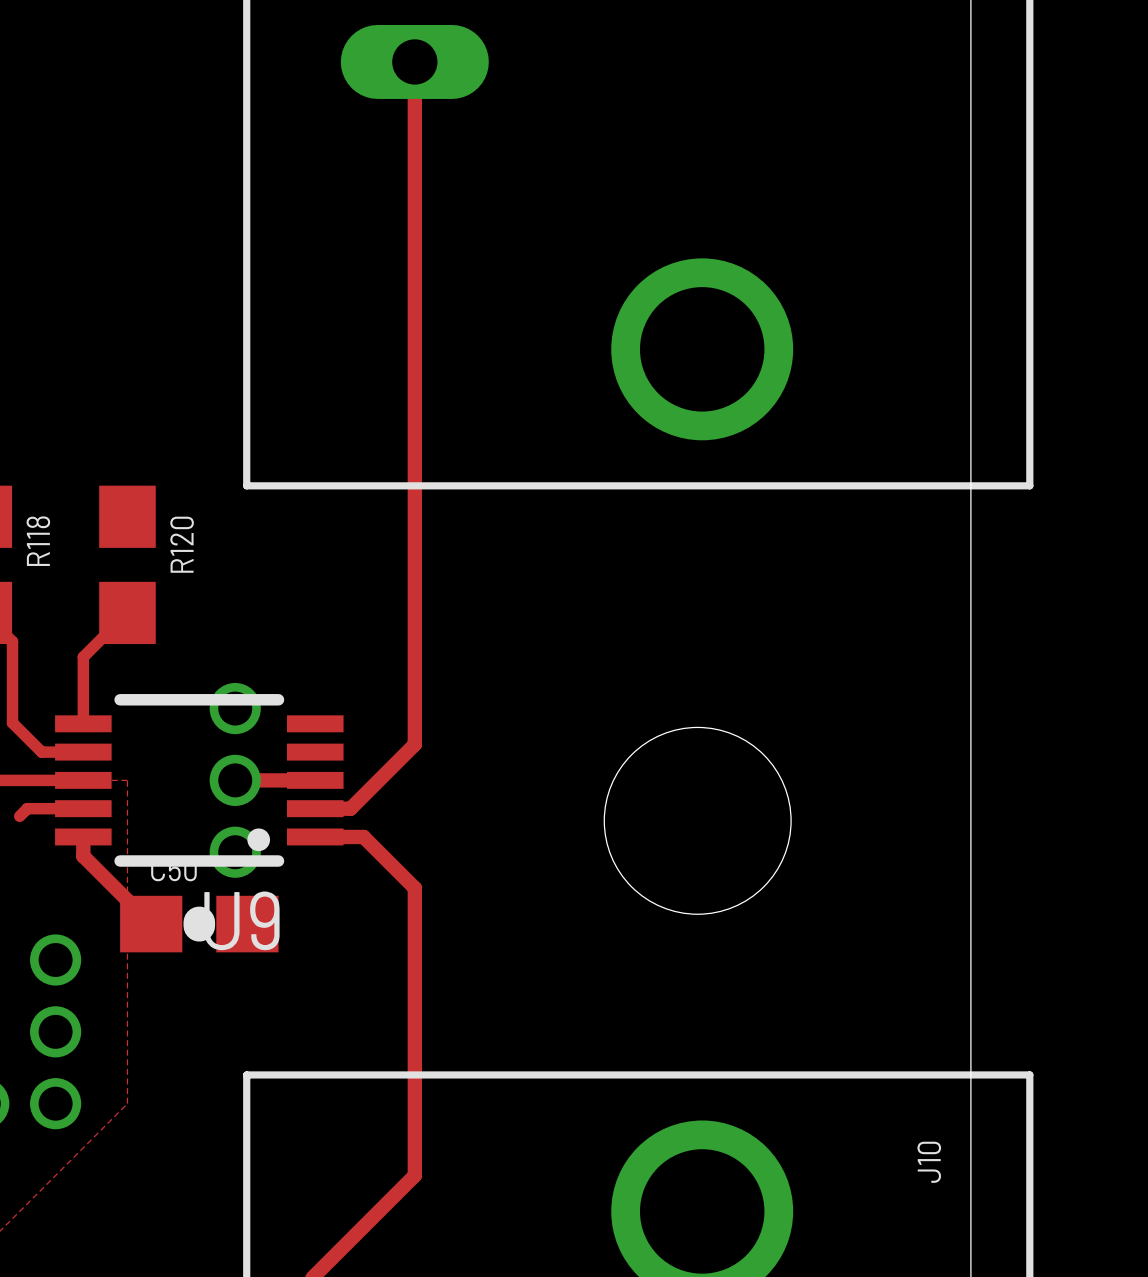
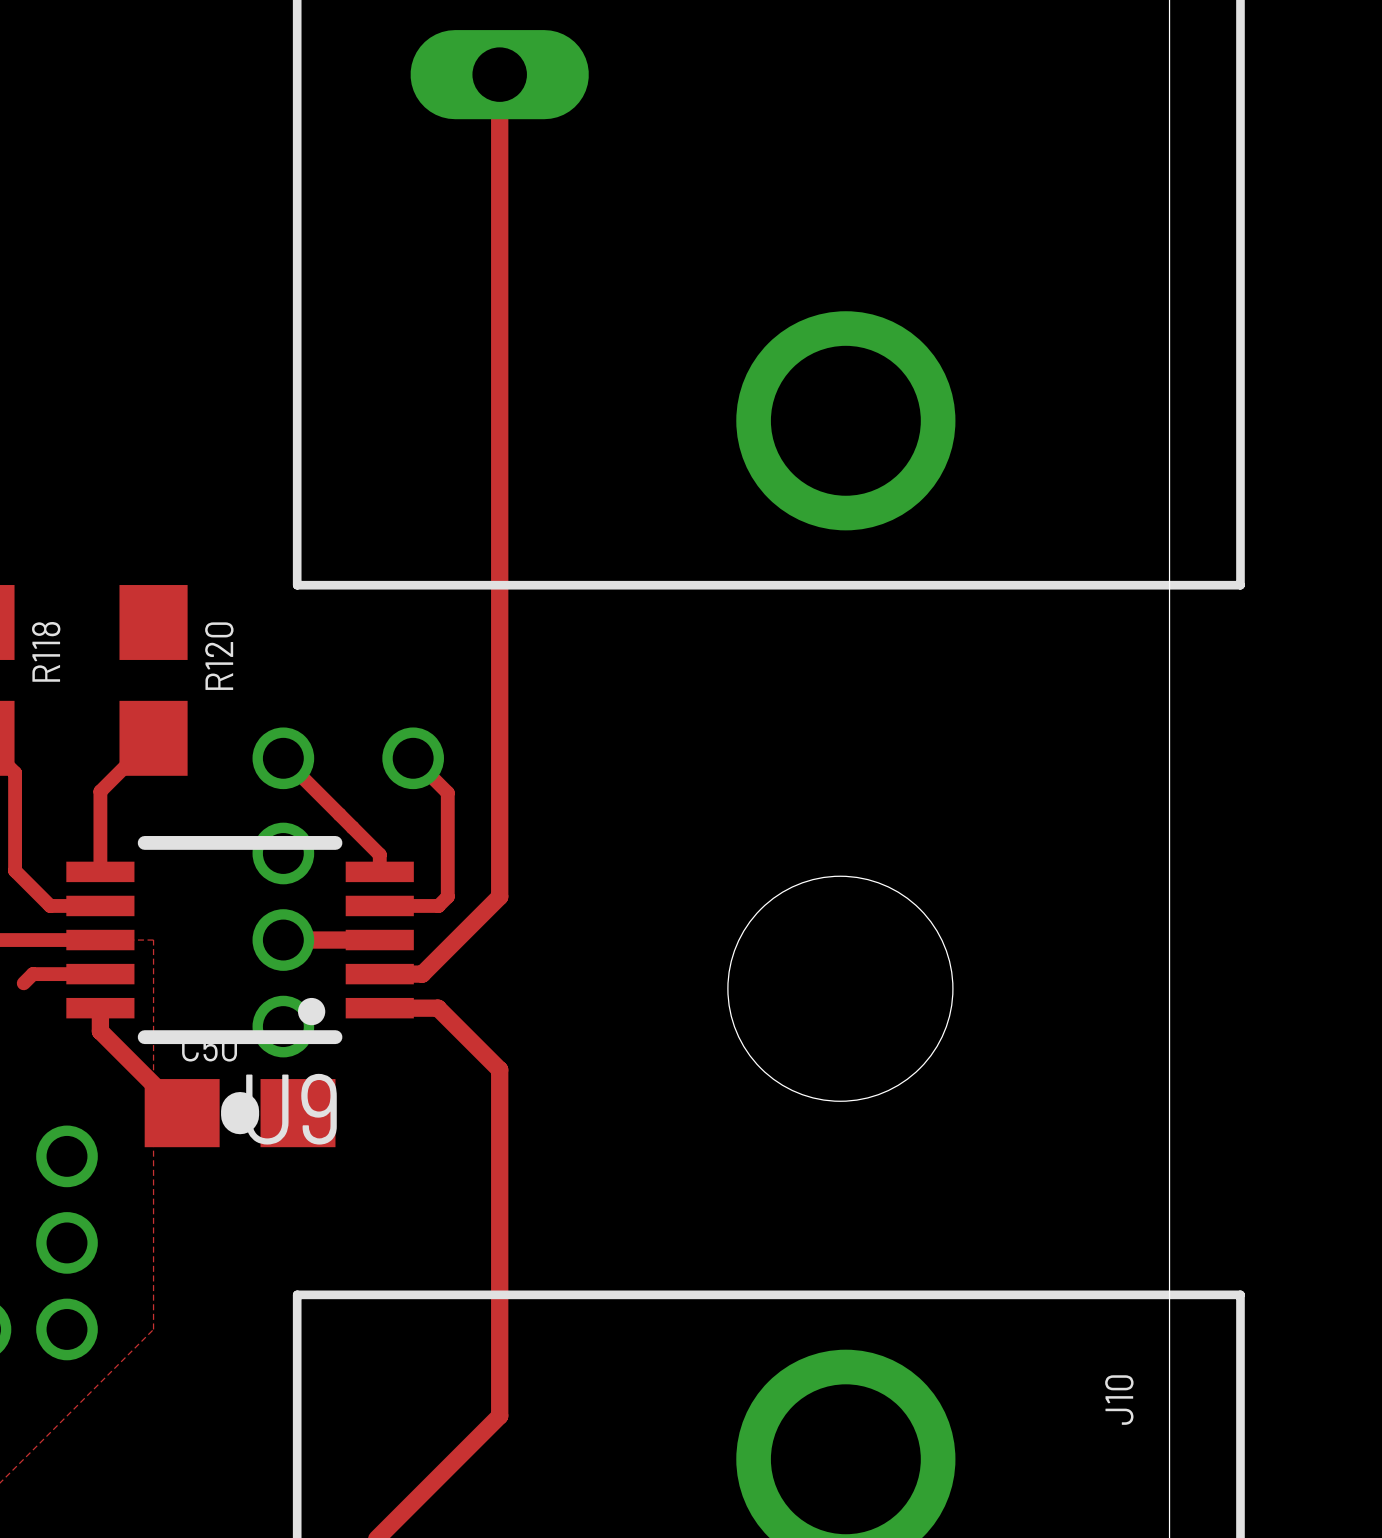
track: none -> (283, 758) (379, 854) (379, 871)
via: none -> (283, 758)
track: none -> (413, 758) (447, 792) (447, 896) (438, 905) (379, 905)
via: none -> (413, 758)

